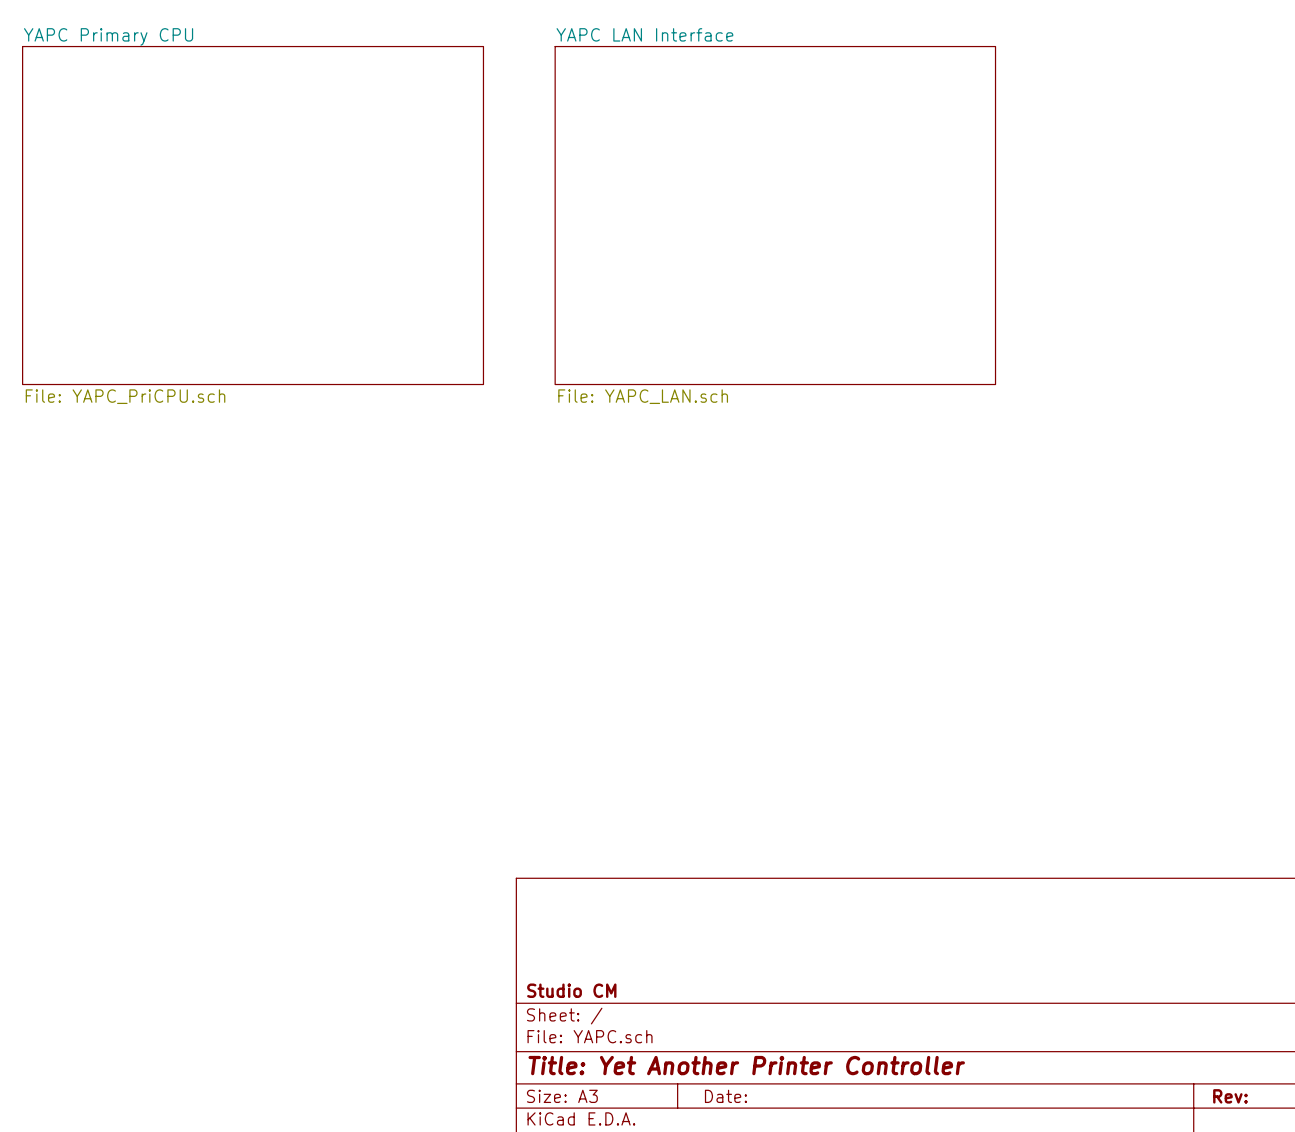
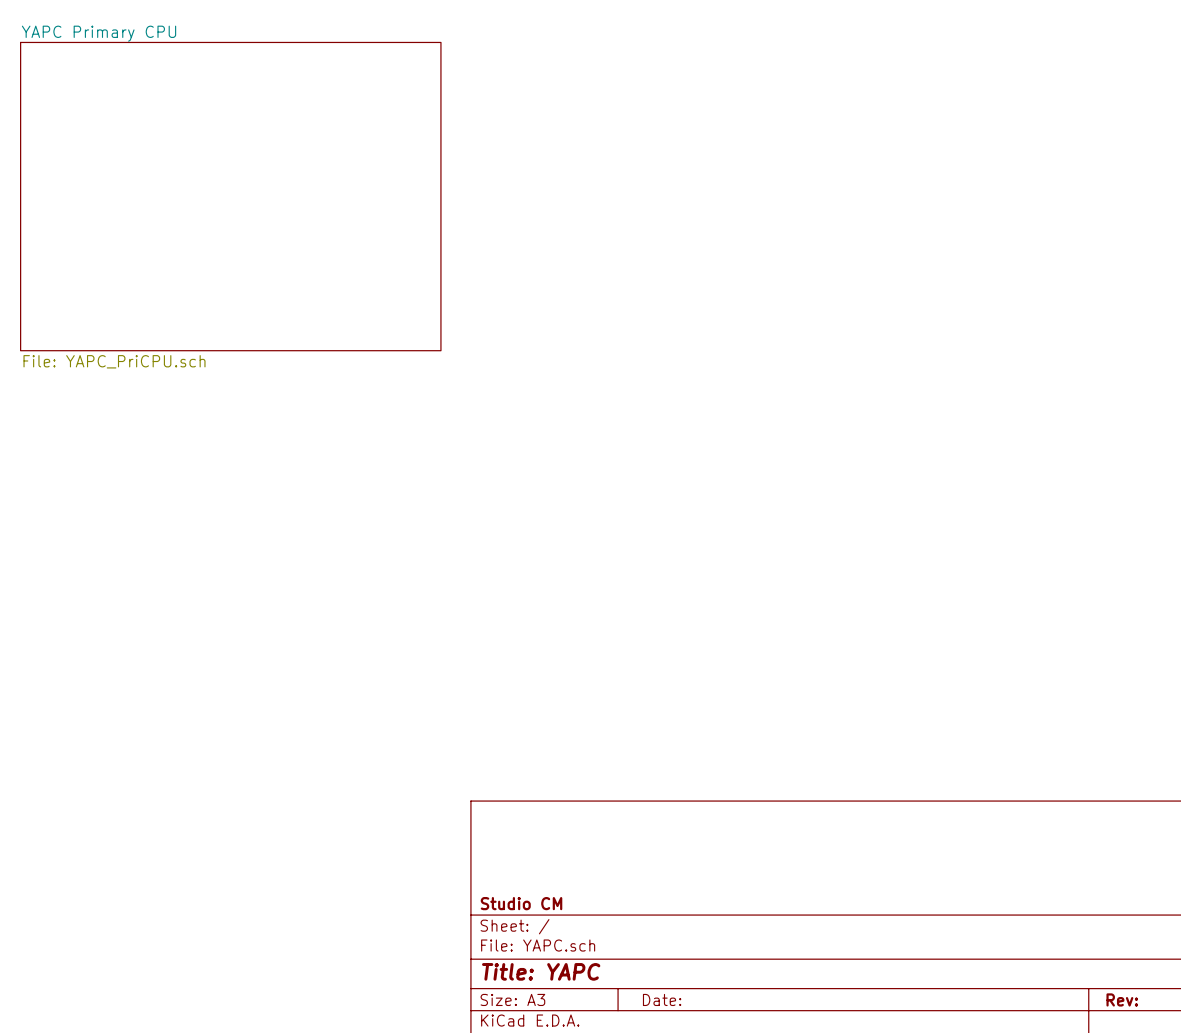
sheet YAPC LAN Interface: File: YAPC_LAN.sch (775, 215) -> none
title block: Title: Yet Another Printer Controller (746, 1065) -> Title: YAPC (541, 971)

